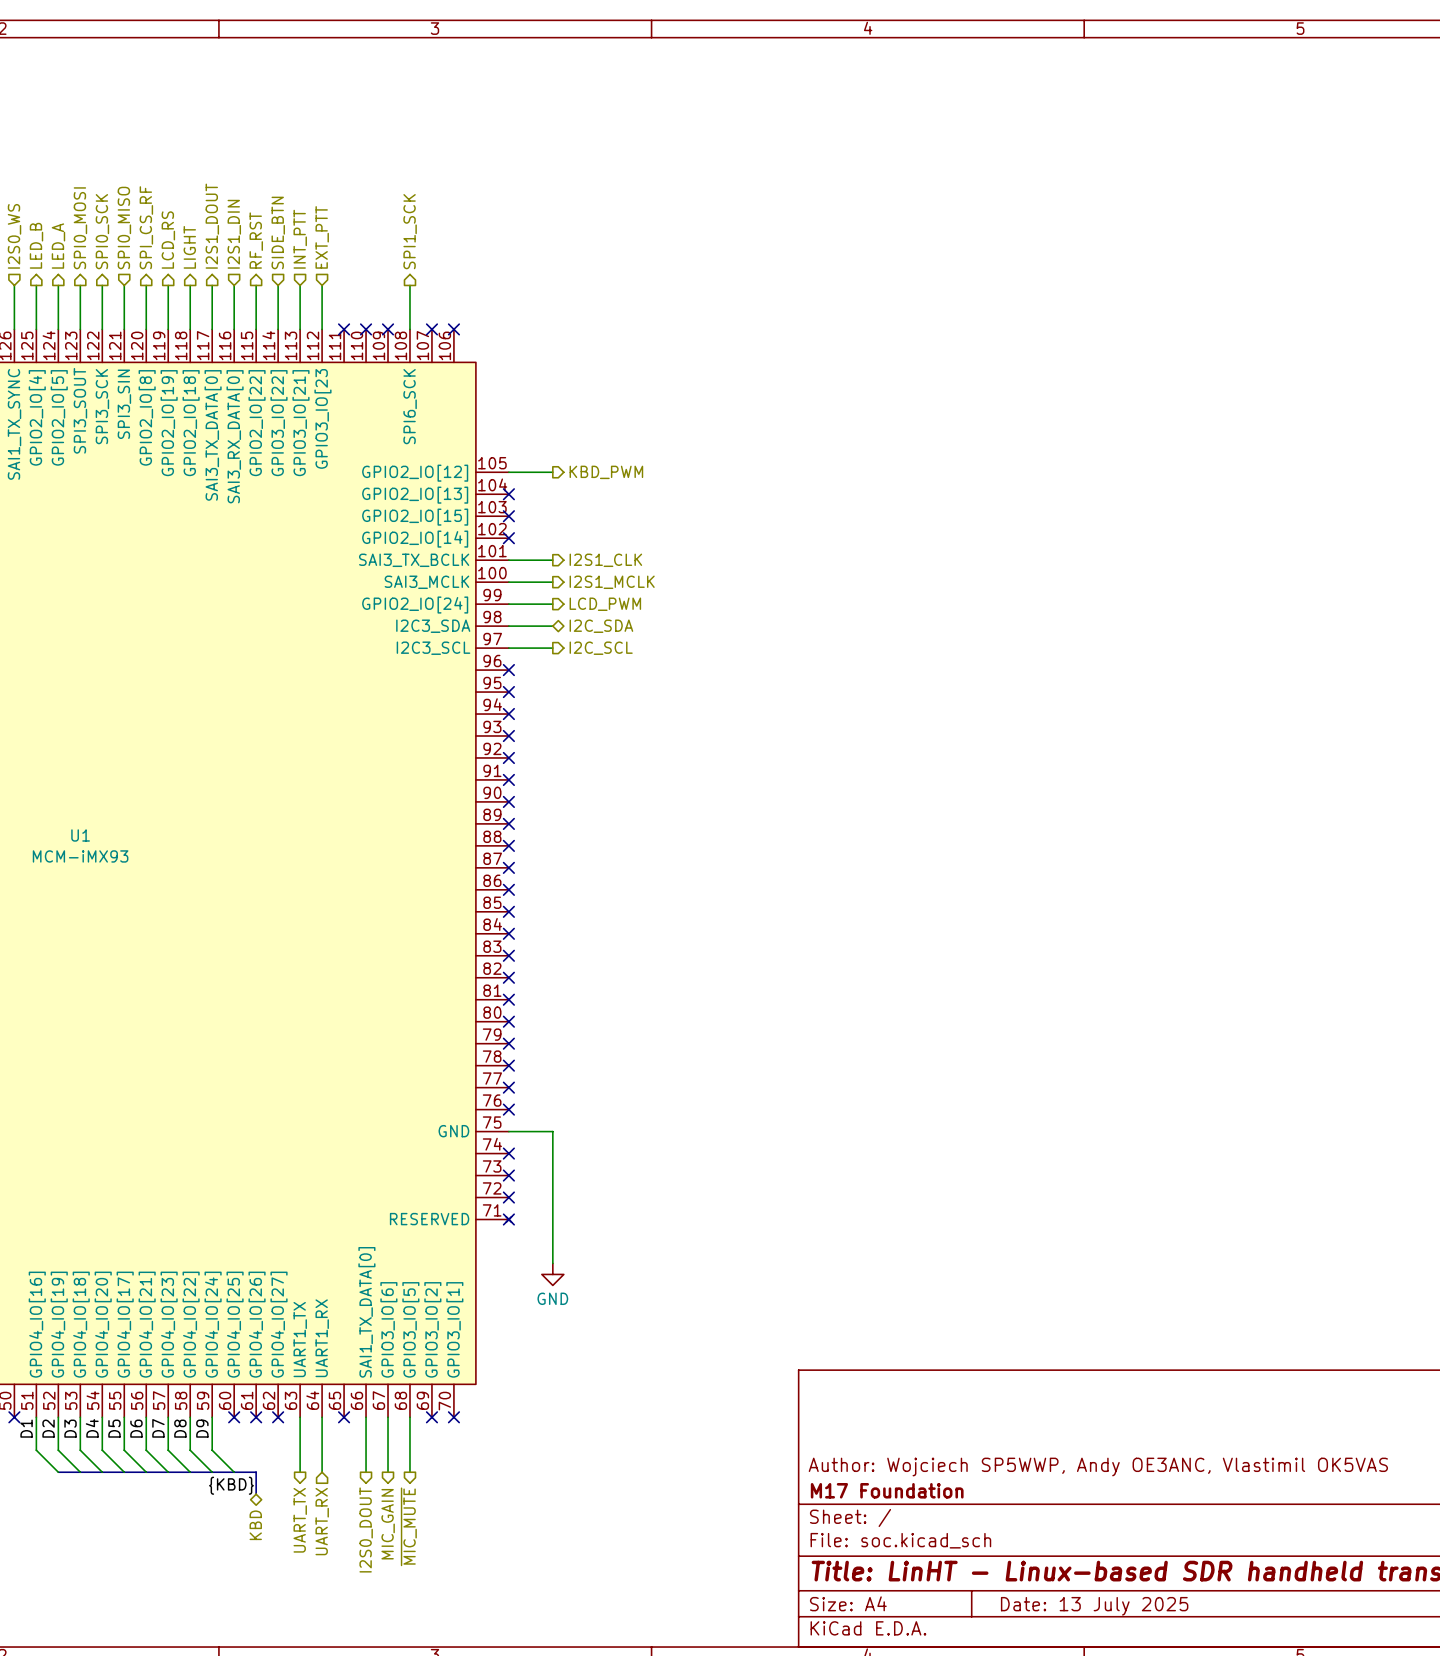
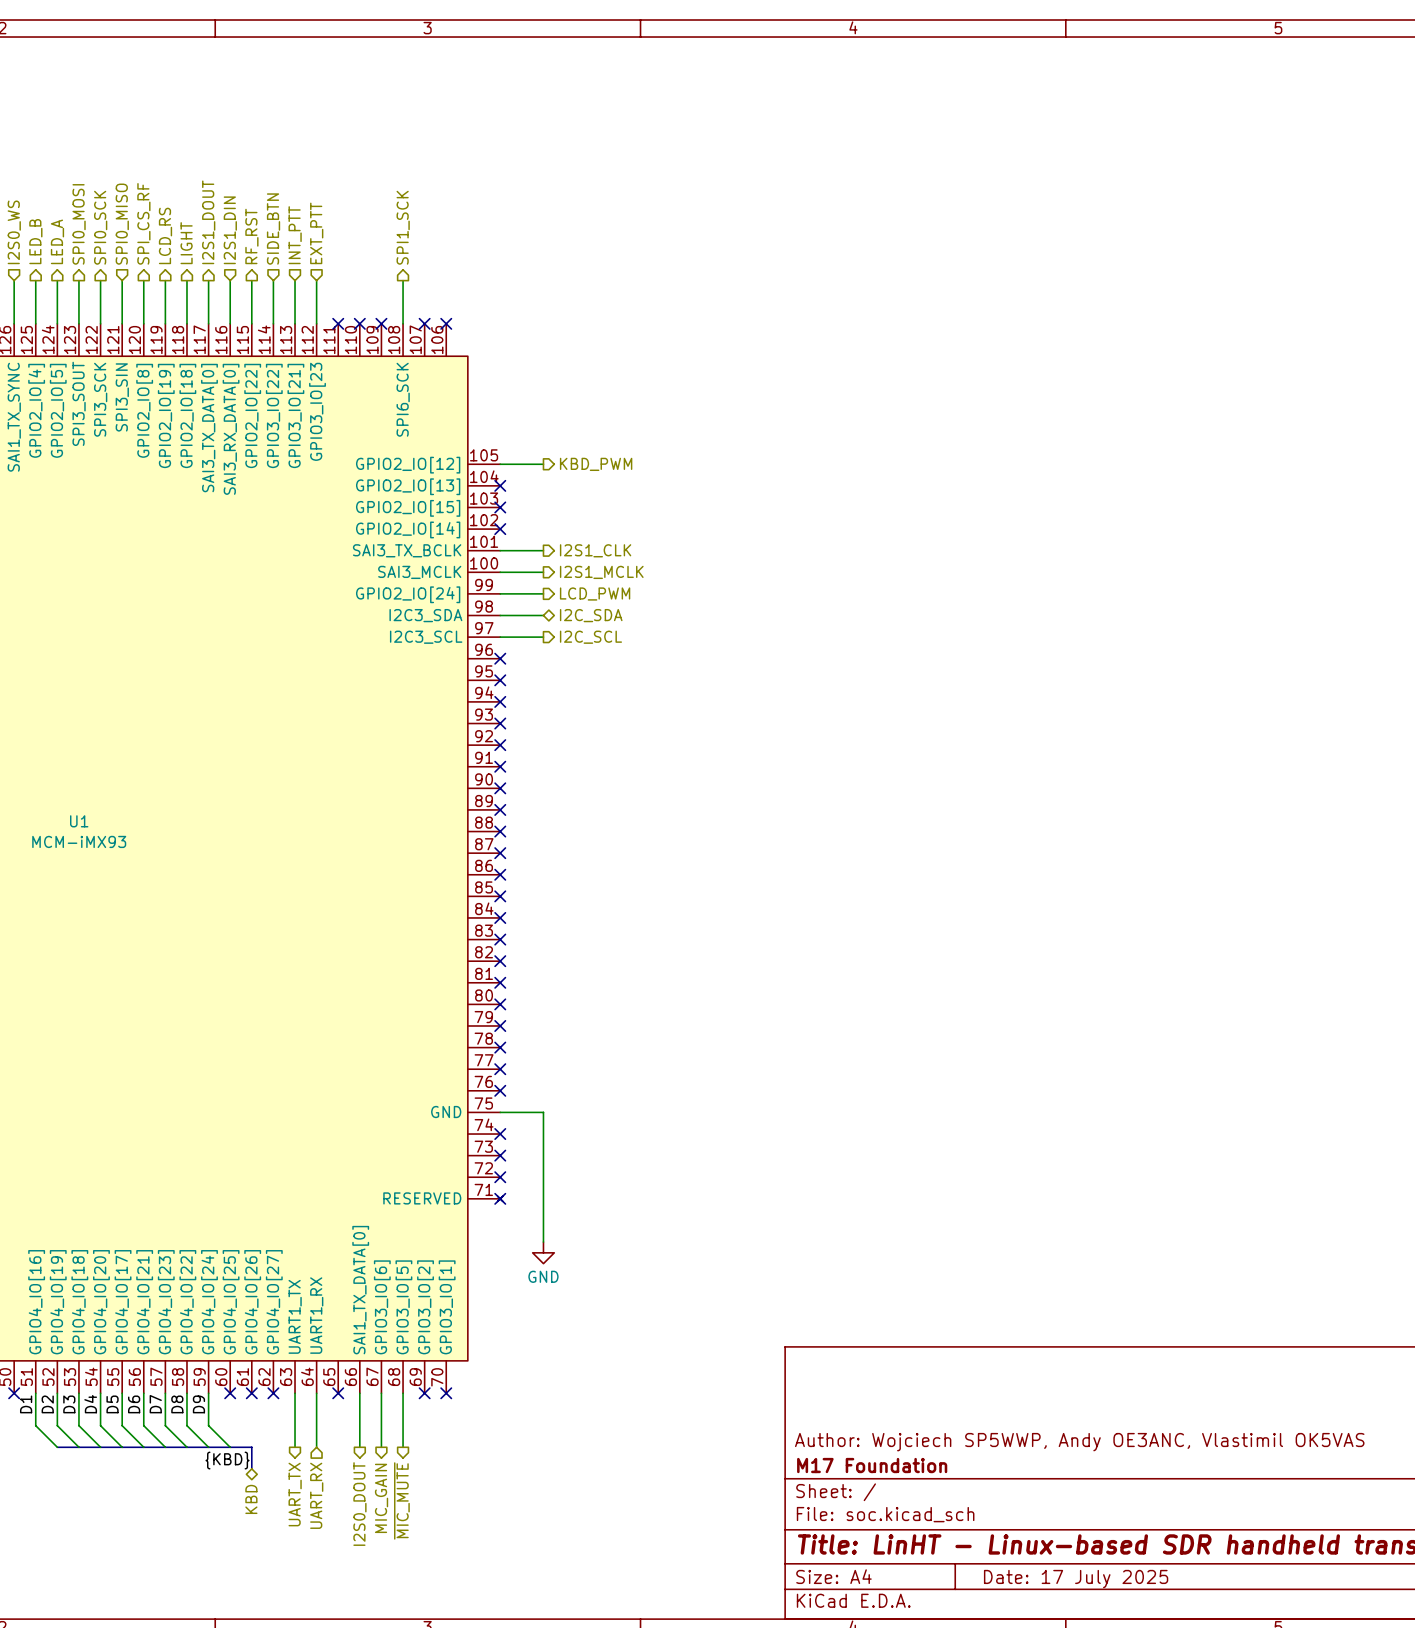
title block: Date: 13 July 2025 (1094, 1606) -> Date: 17 July 2025 (1076, 1579)

